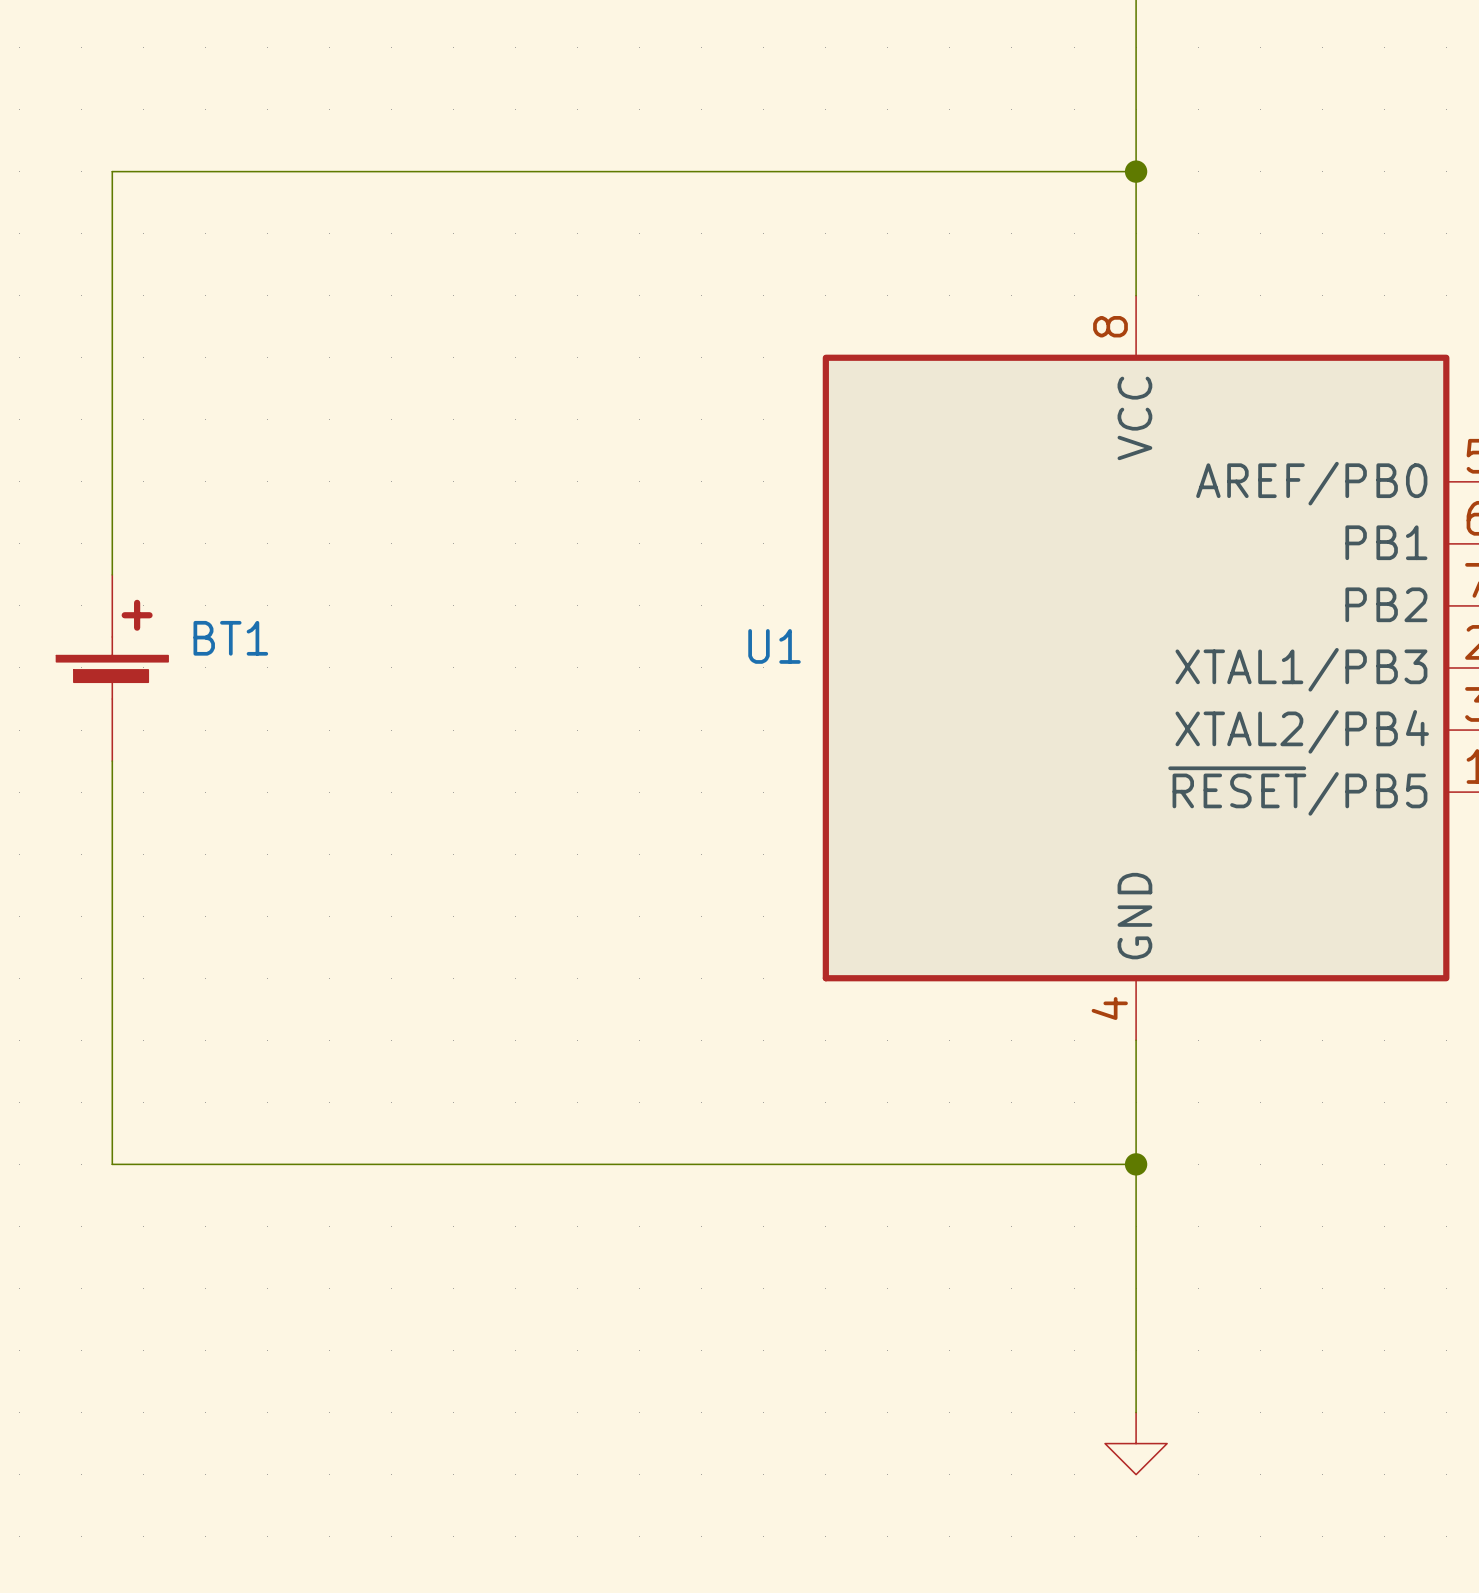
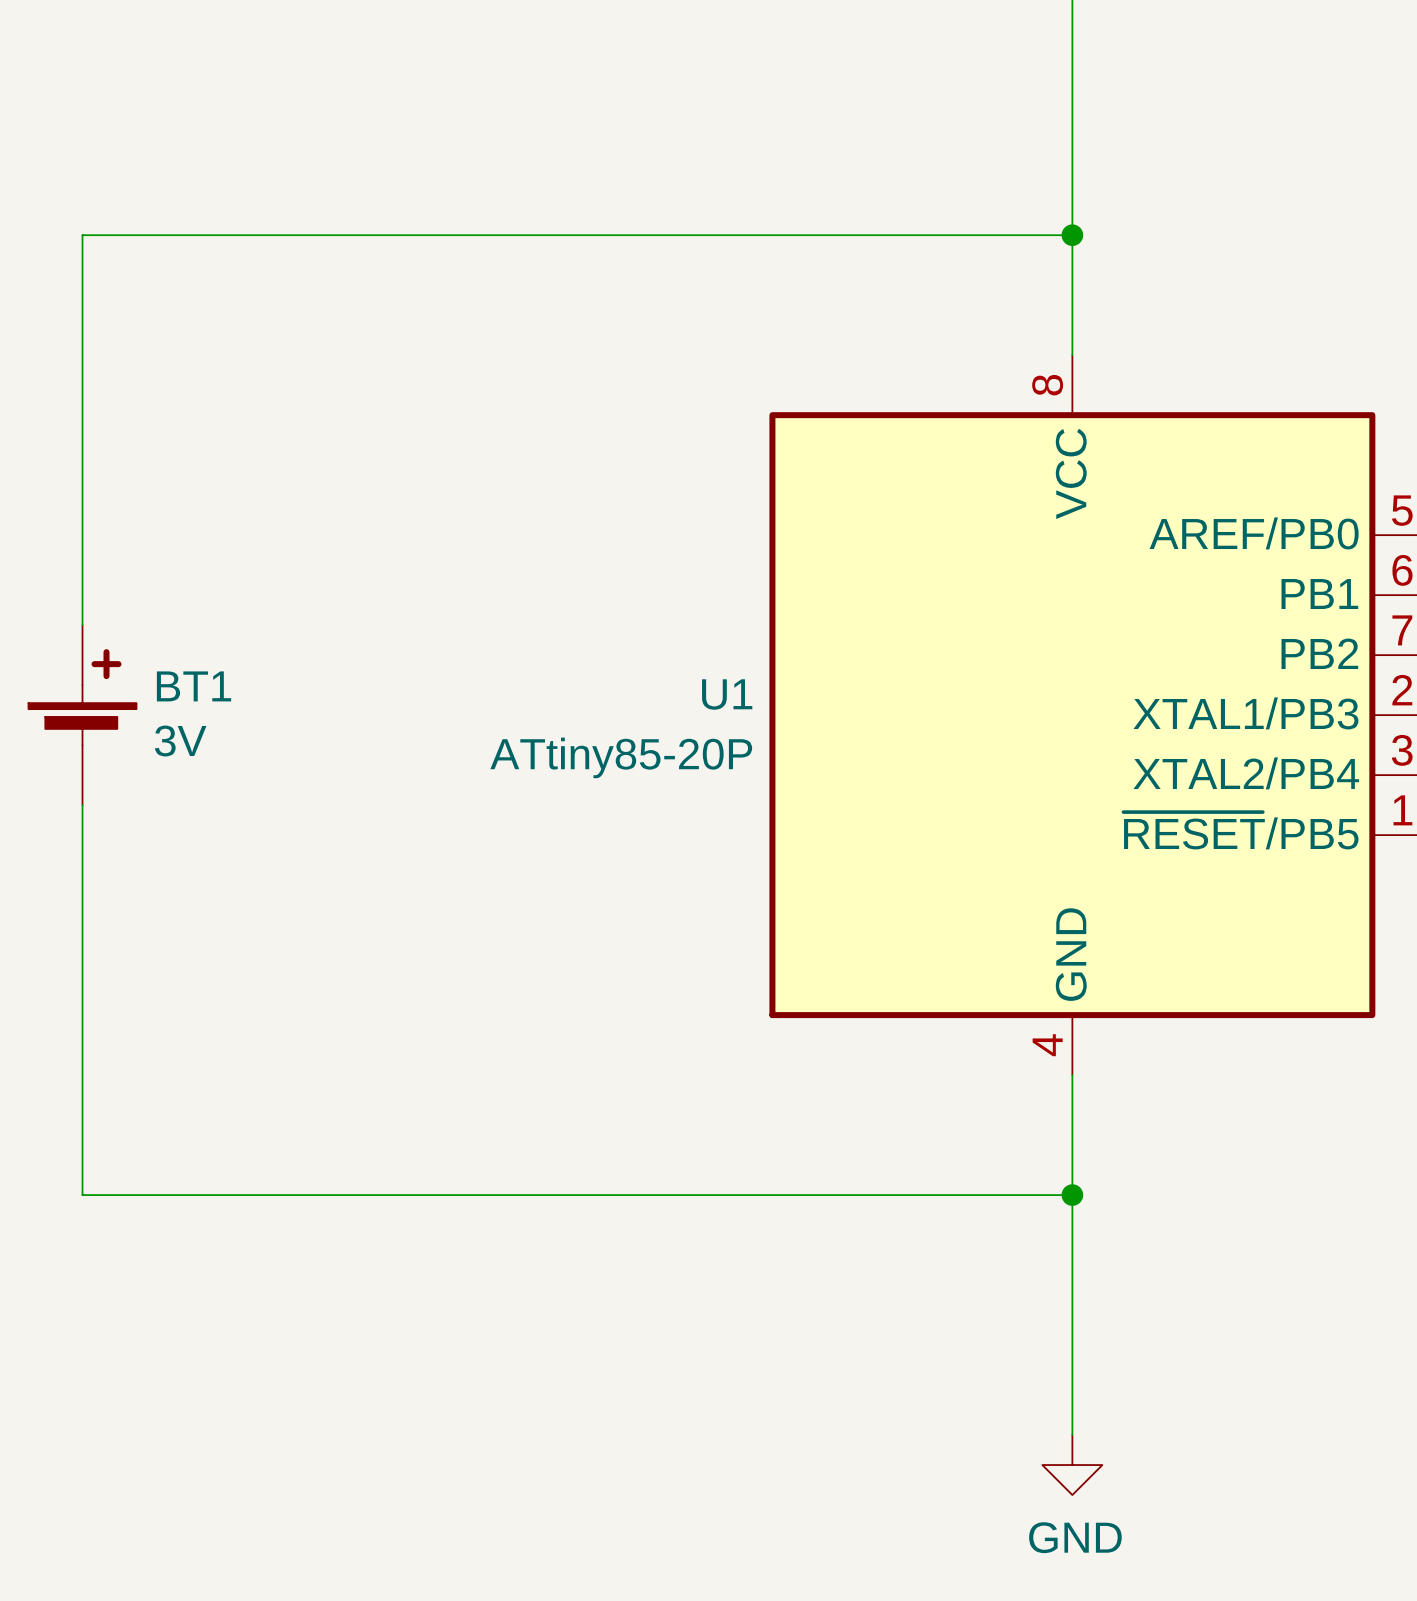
BT1 value: none -> 3V (180, 740)
U1 value: none -> ATtiny85-20P (621, 757)
power symbol text: none -> GND (1075, 1537)

